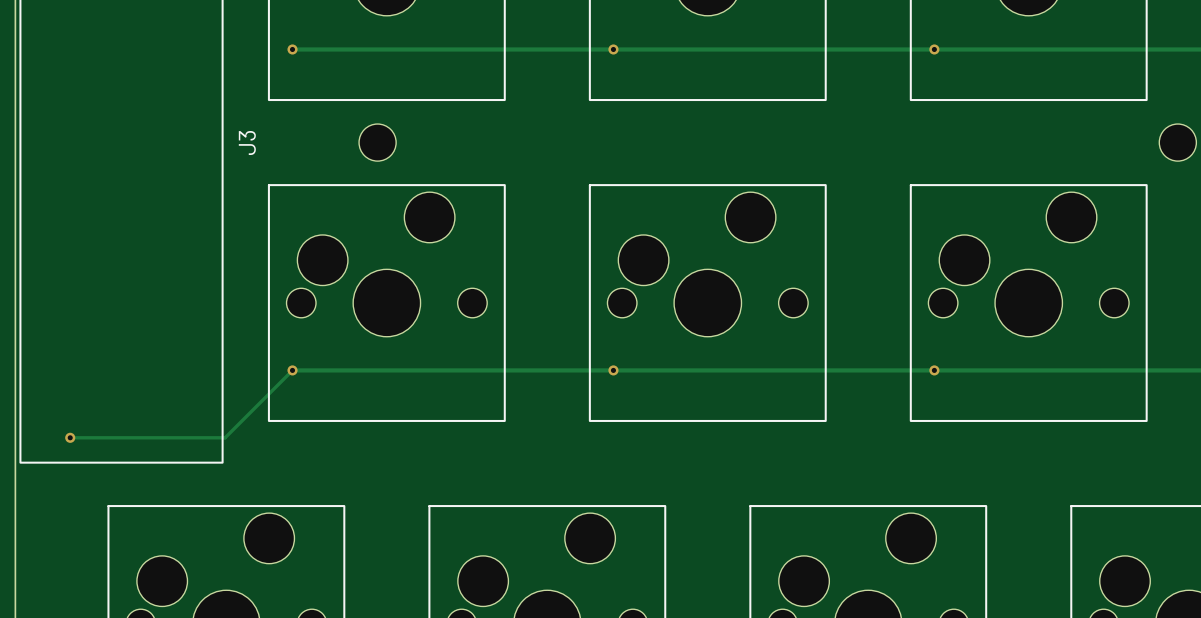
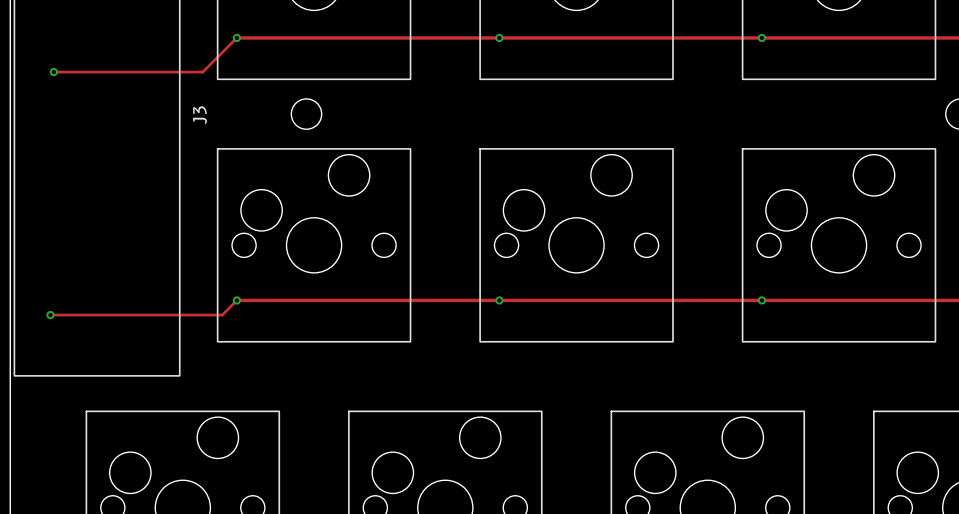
track: none -> (236, 37) (202, 72) (53, 72)
via: none -> (53, 72)
track: (274, 388) (225, 437) (70, 437) -> (222, 315) (50, 315)
via position: (70, 437) -> (50, 315)

